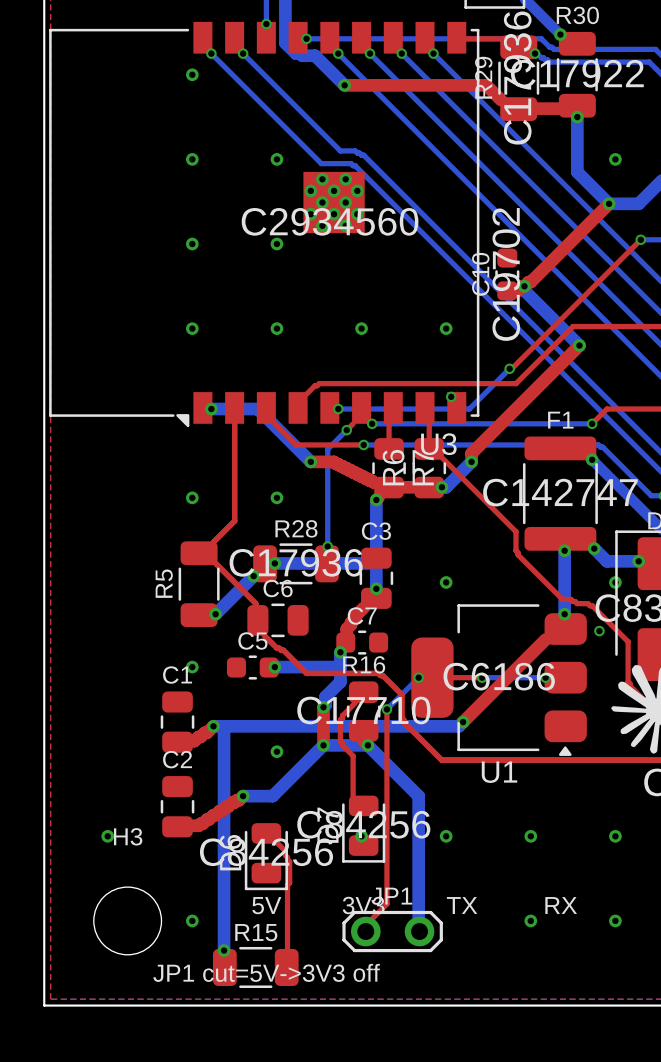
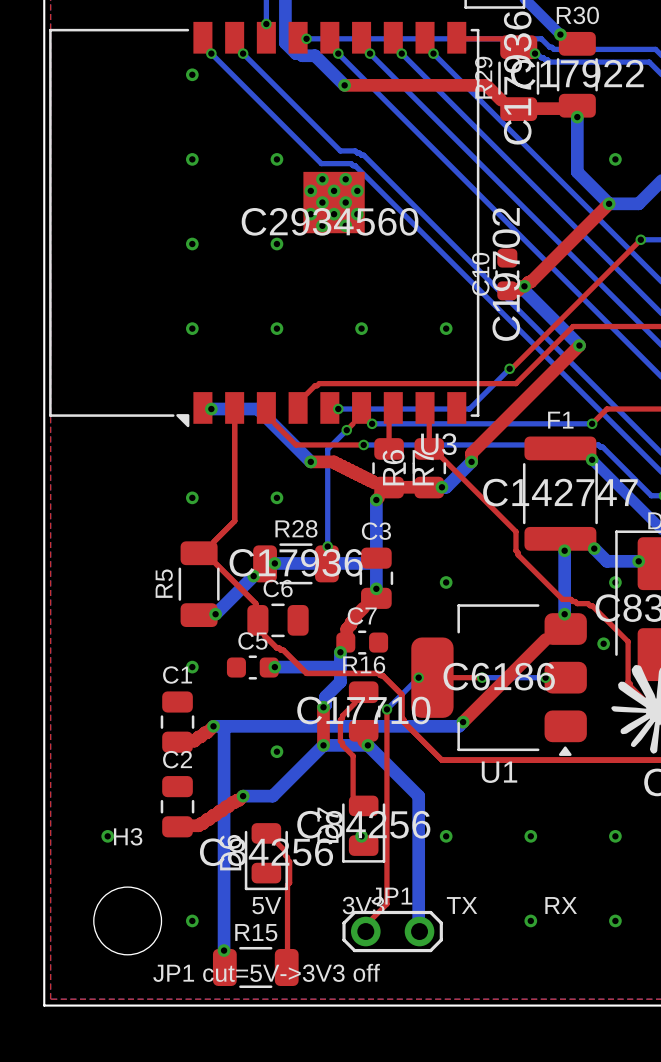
via: (451, 396) -> none
via: (599, 631) -> none
via: none -> (603, 643)

